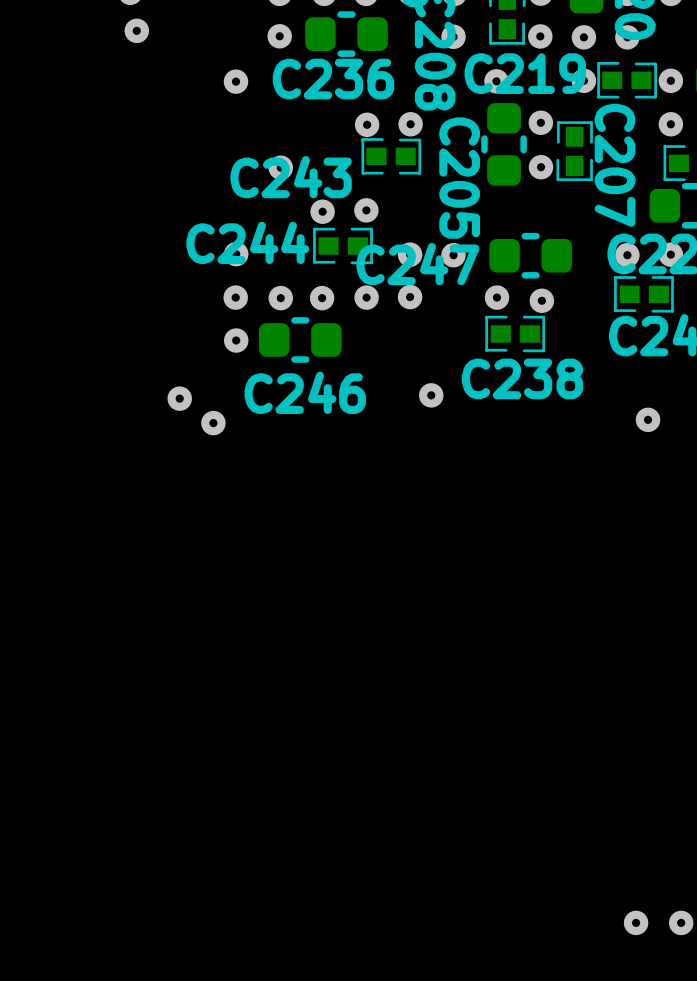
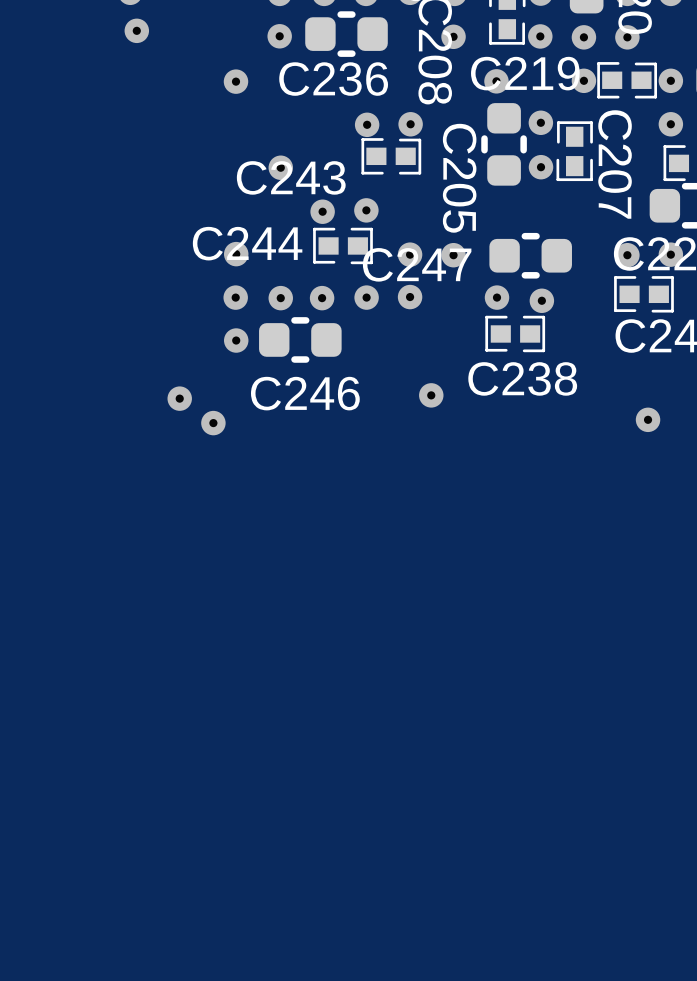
via: (636, 922) -> none
via: (681, 922) -> none

